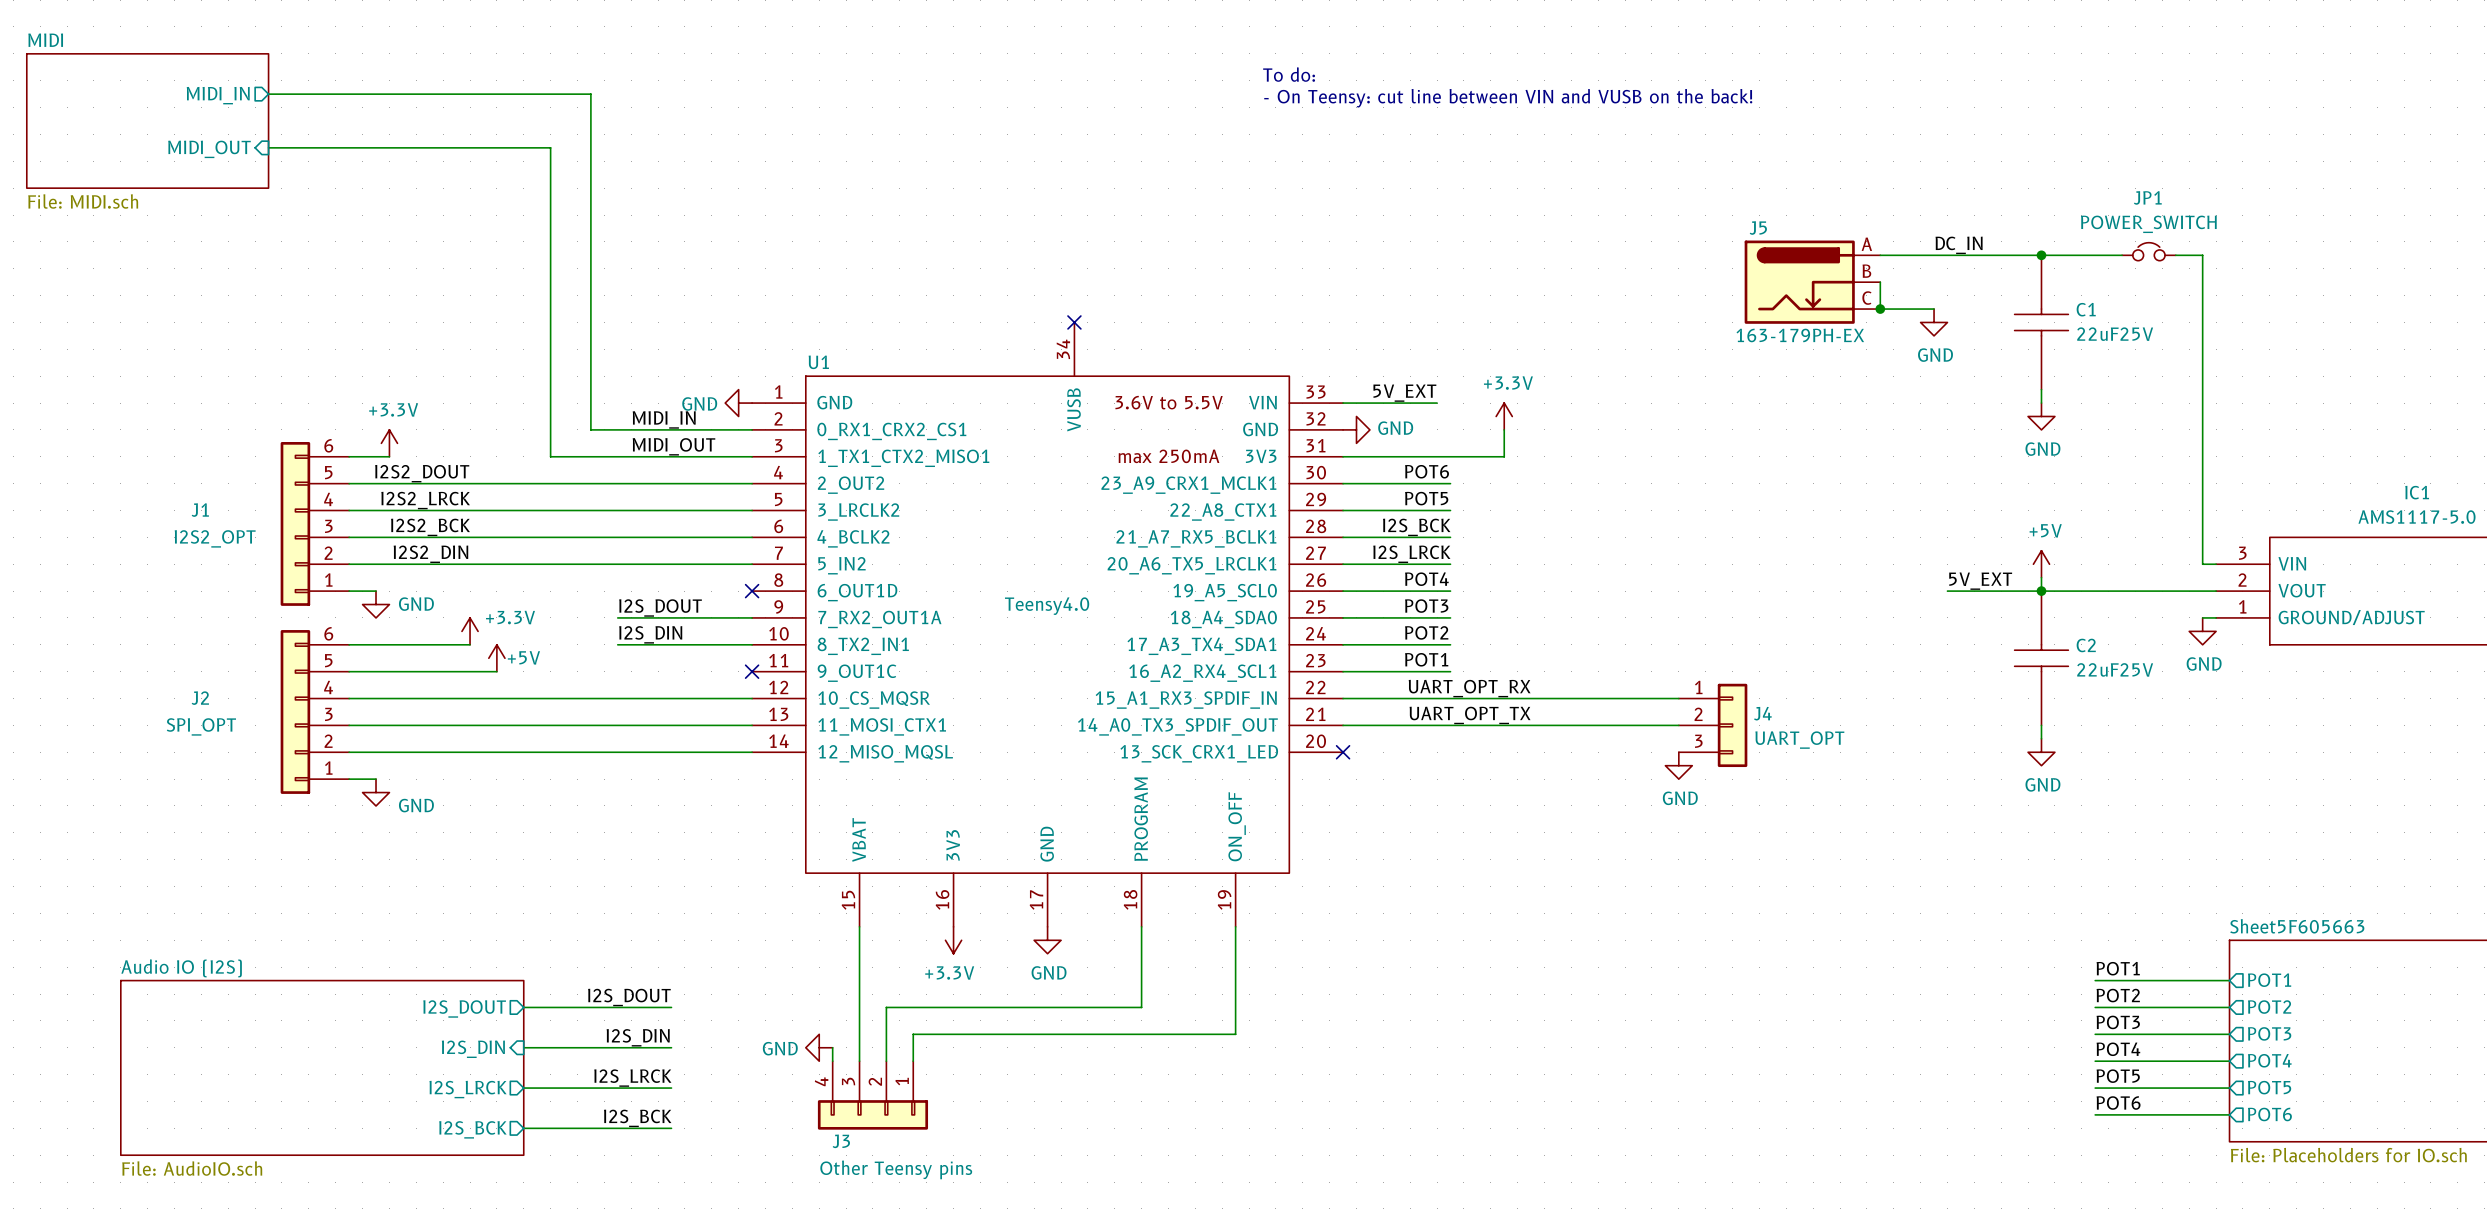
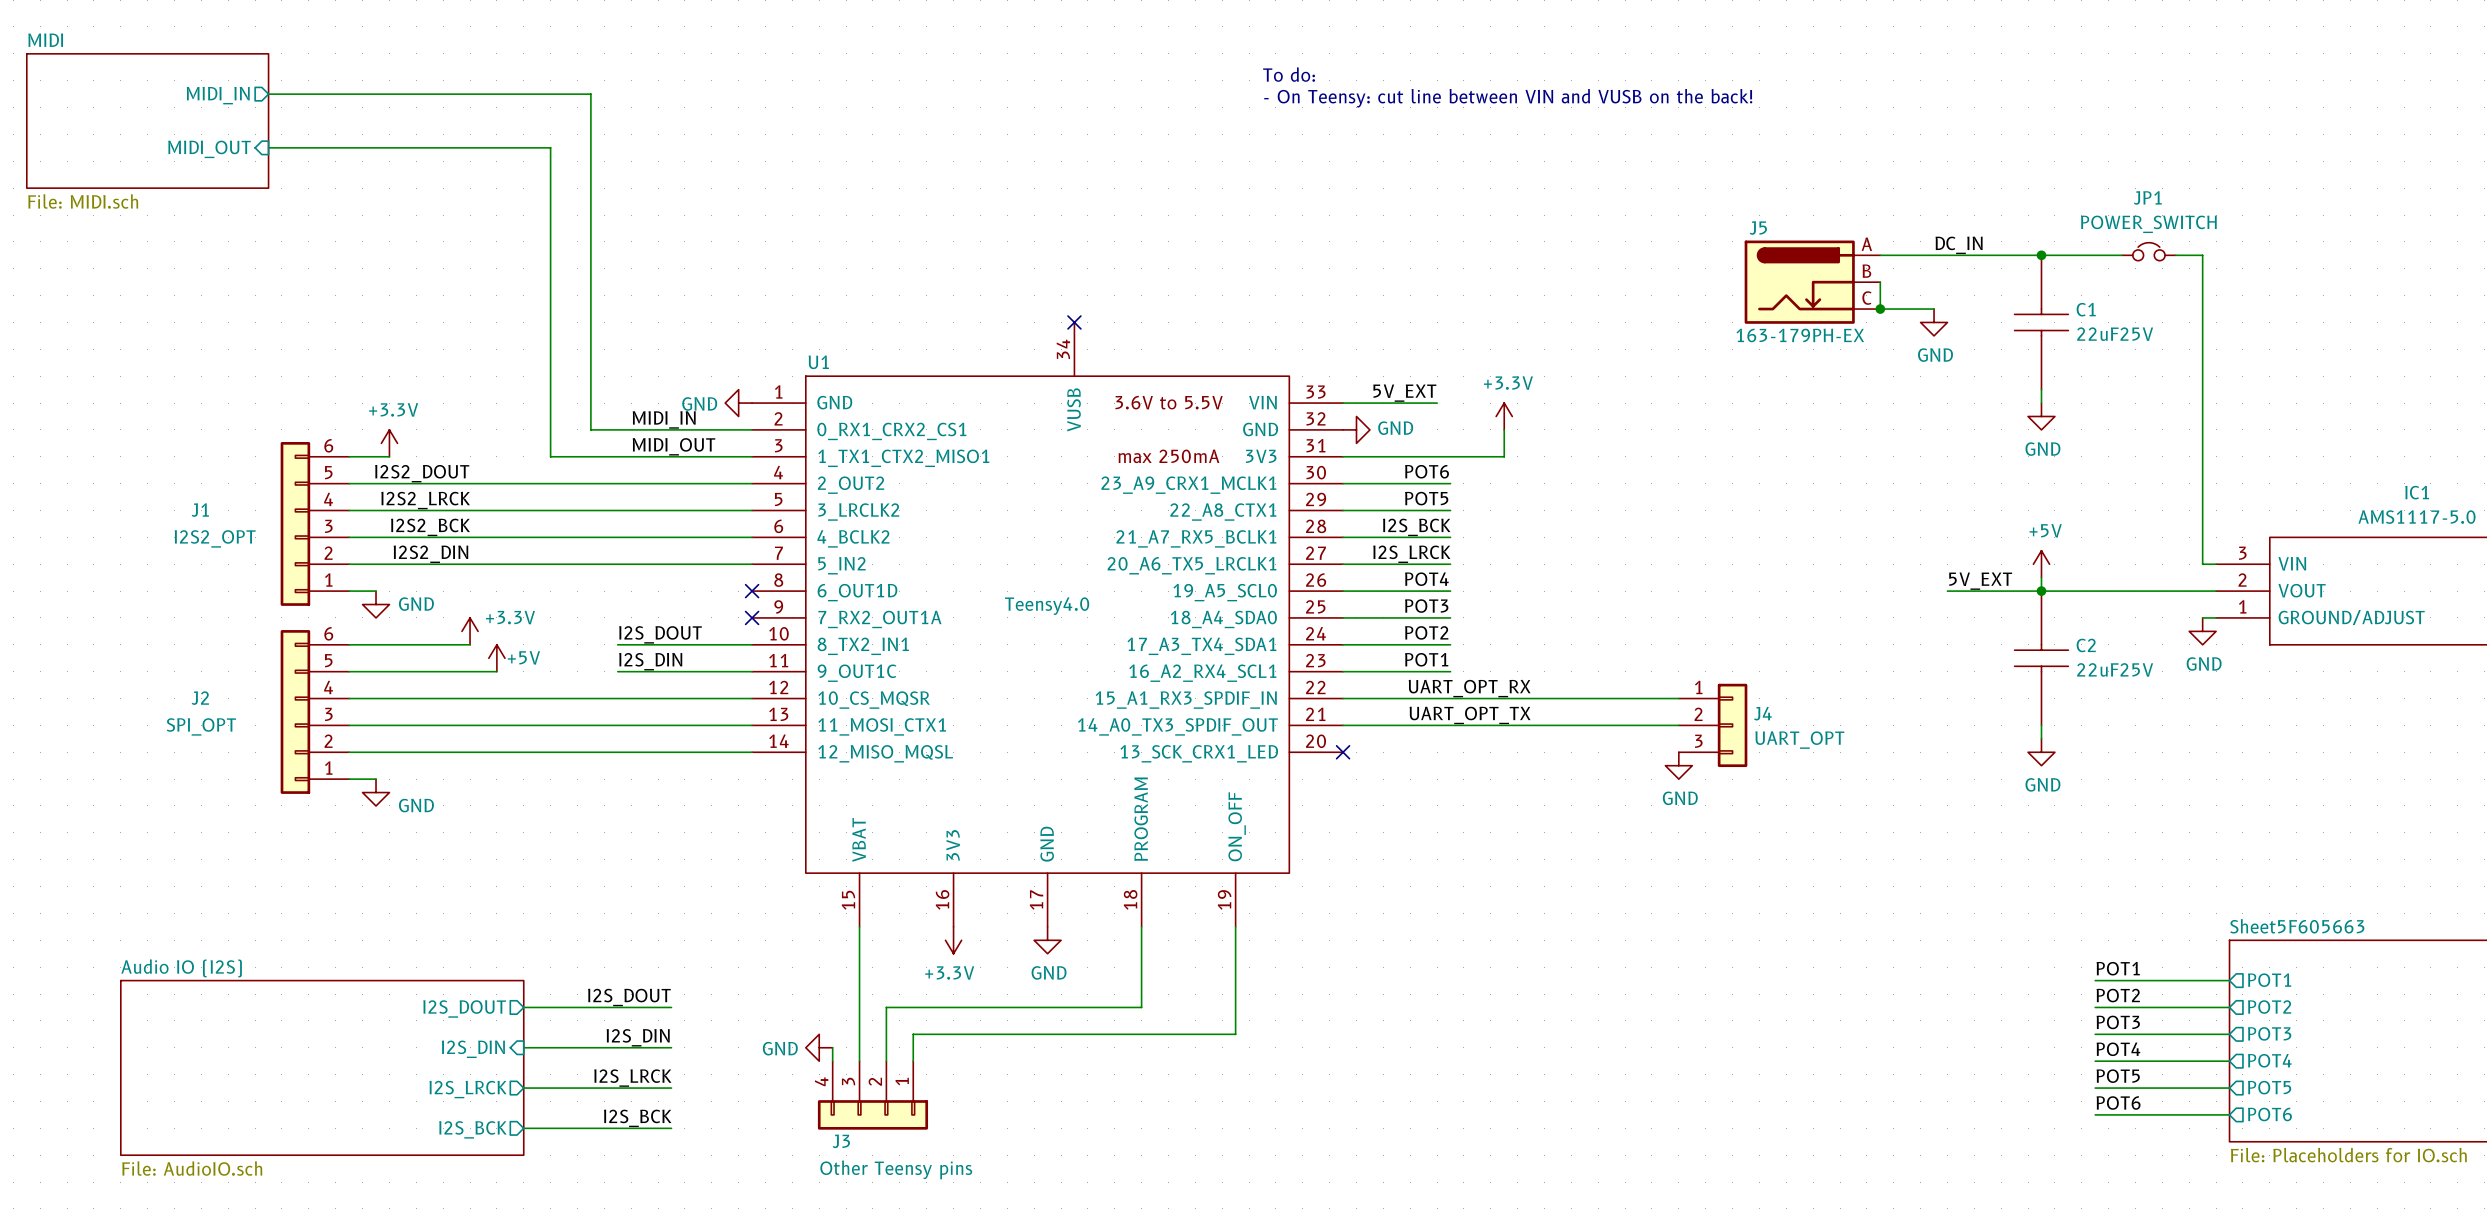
label: I2S_DOUT (660, 607) -> none
wire: (617, 617) (752, 617) -> (617, 671) (752, 671)
label: I2S_DIN (650, 634) -> I2S_DOUT (660, 634)
label: none -> I2S_DIN (650, 661)
no-connect mark position: (752, 671) -> (752, 617)

